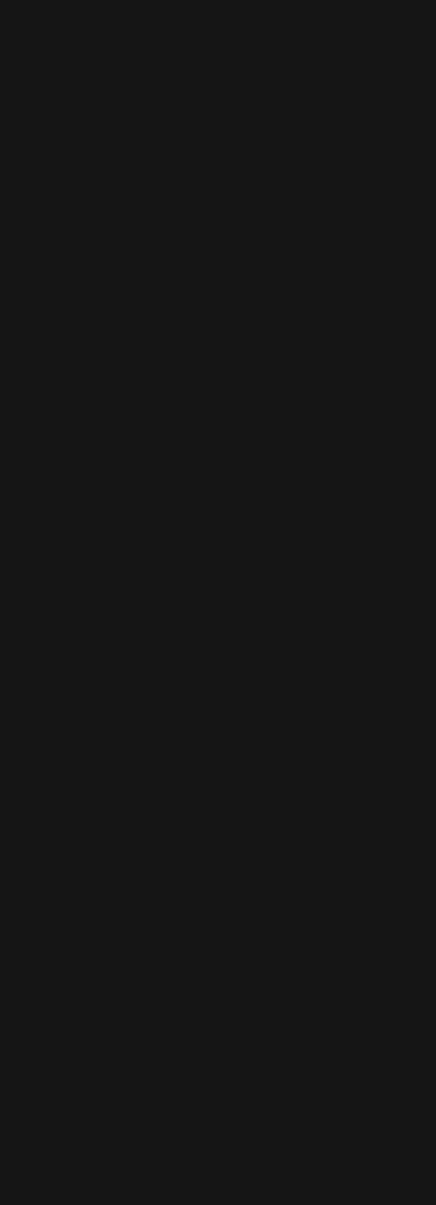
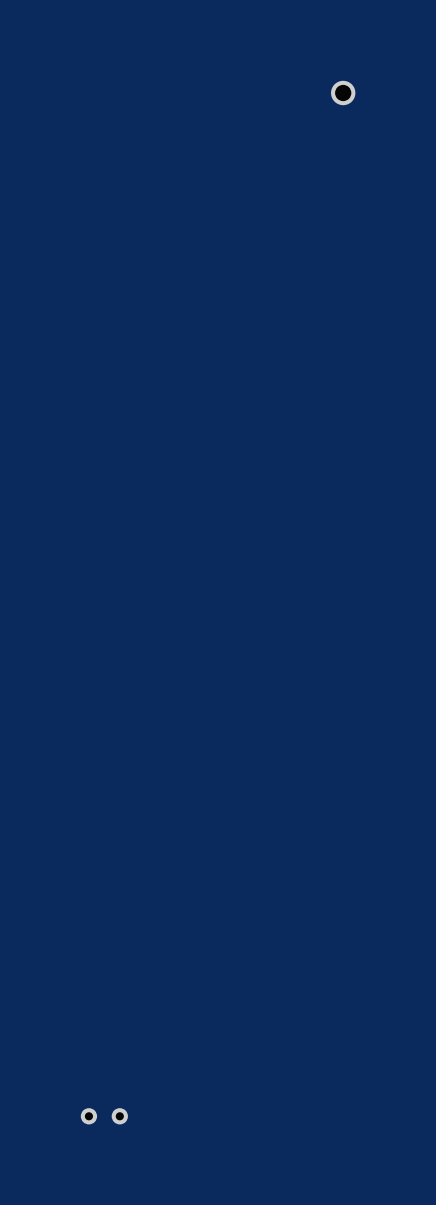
part: none -> (343, 93)
part: none -> (104, 1116)

